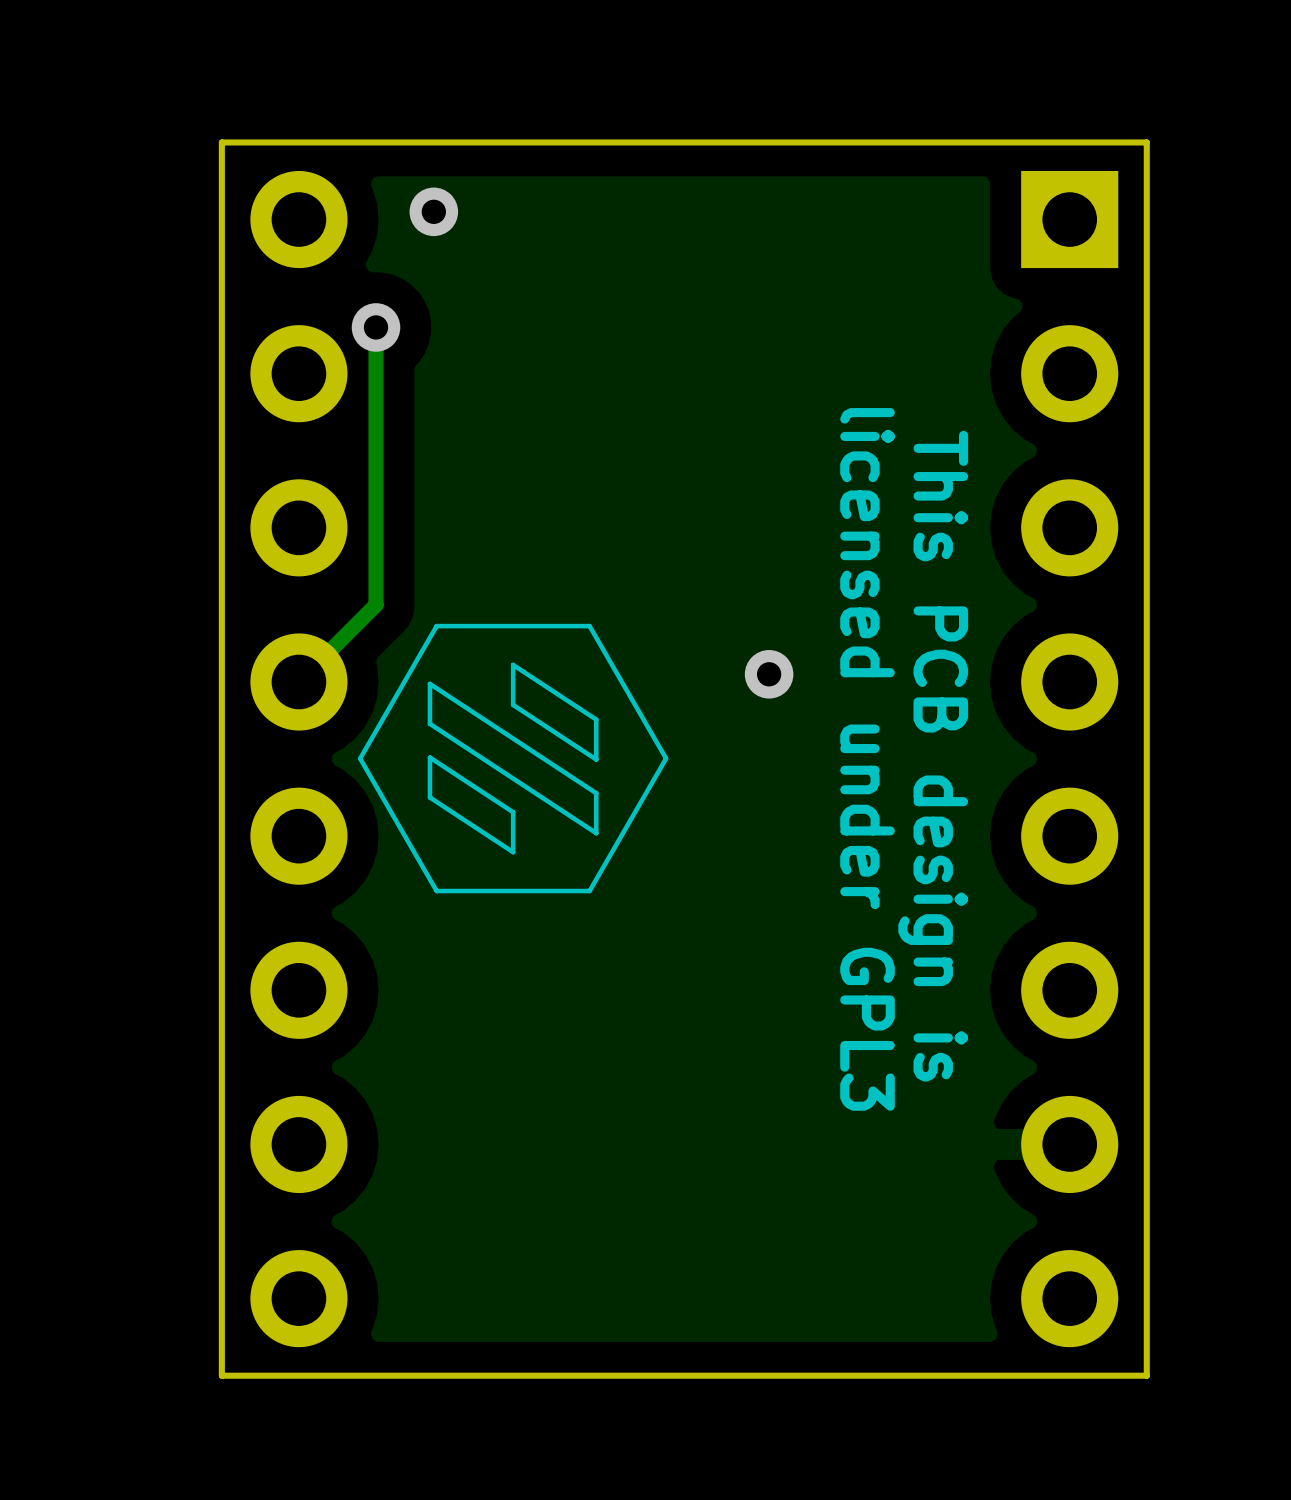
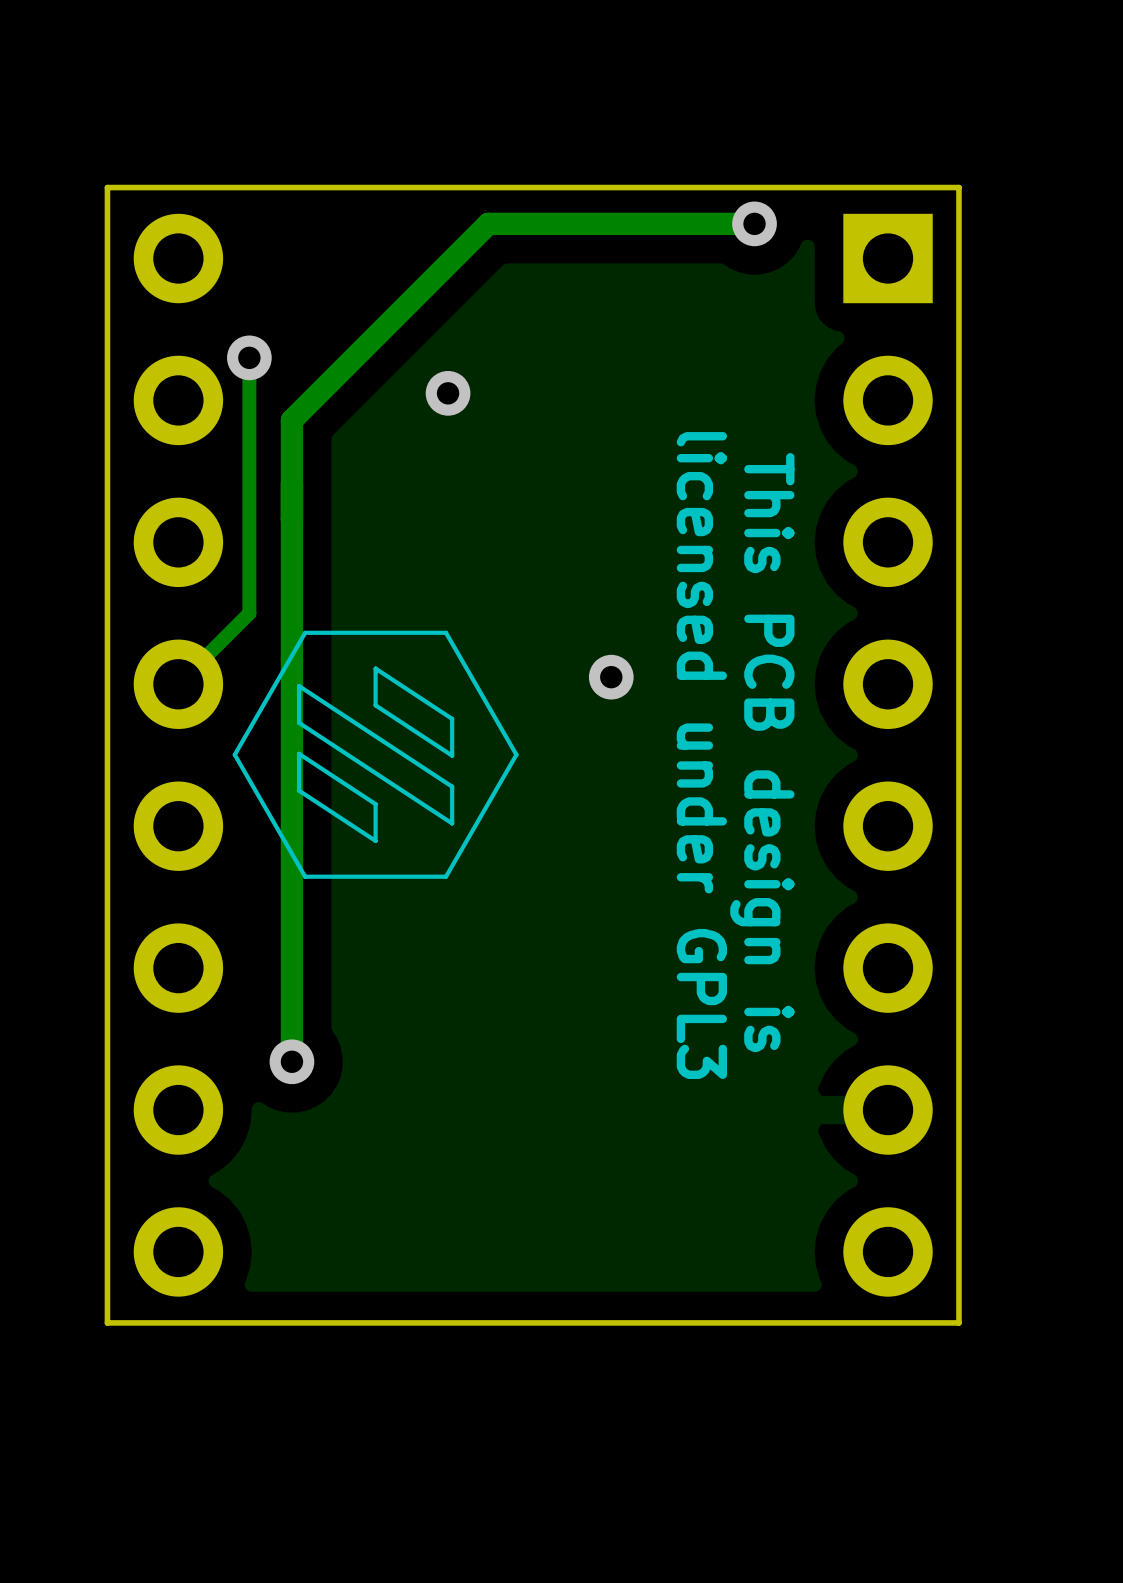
track: none -> (754, 223) (488, 223) (291, 420) (291, 1061)
via: none -> (754, 223)
via position: (433, 211) -> (448, 393)
via: none -> (291, 1061)

